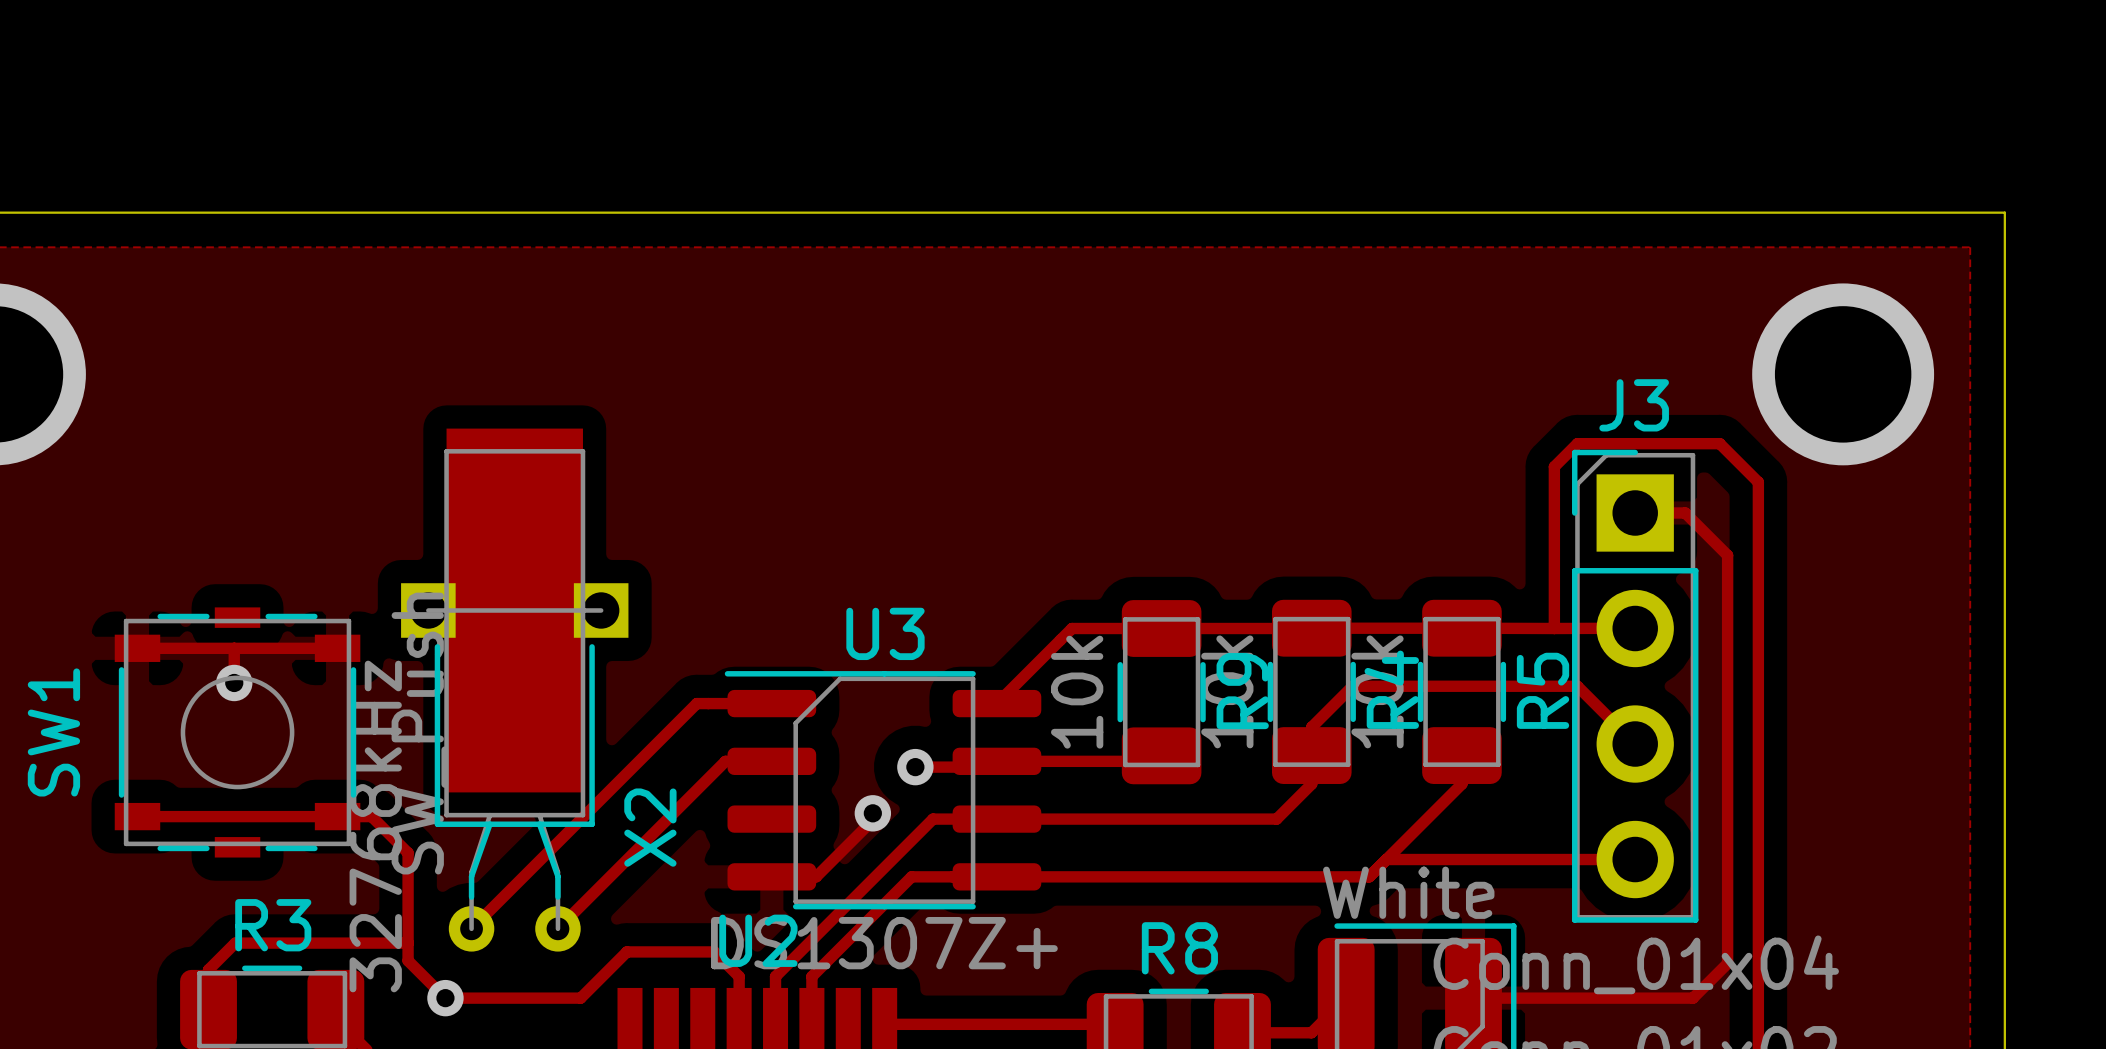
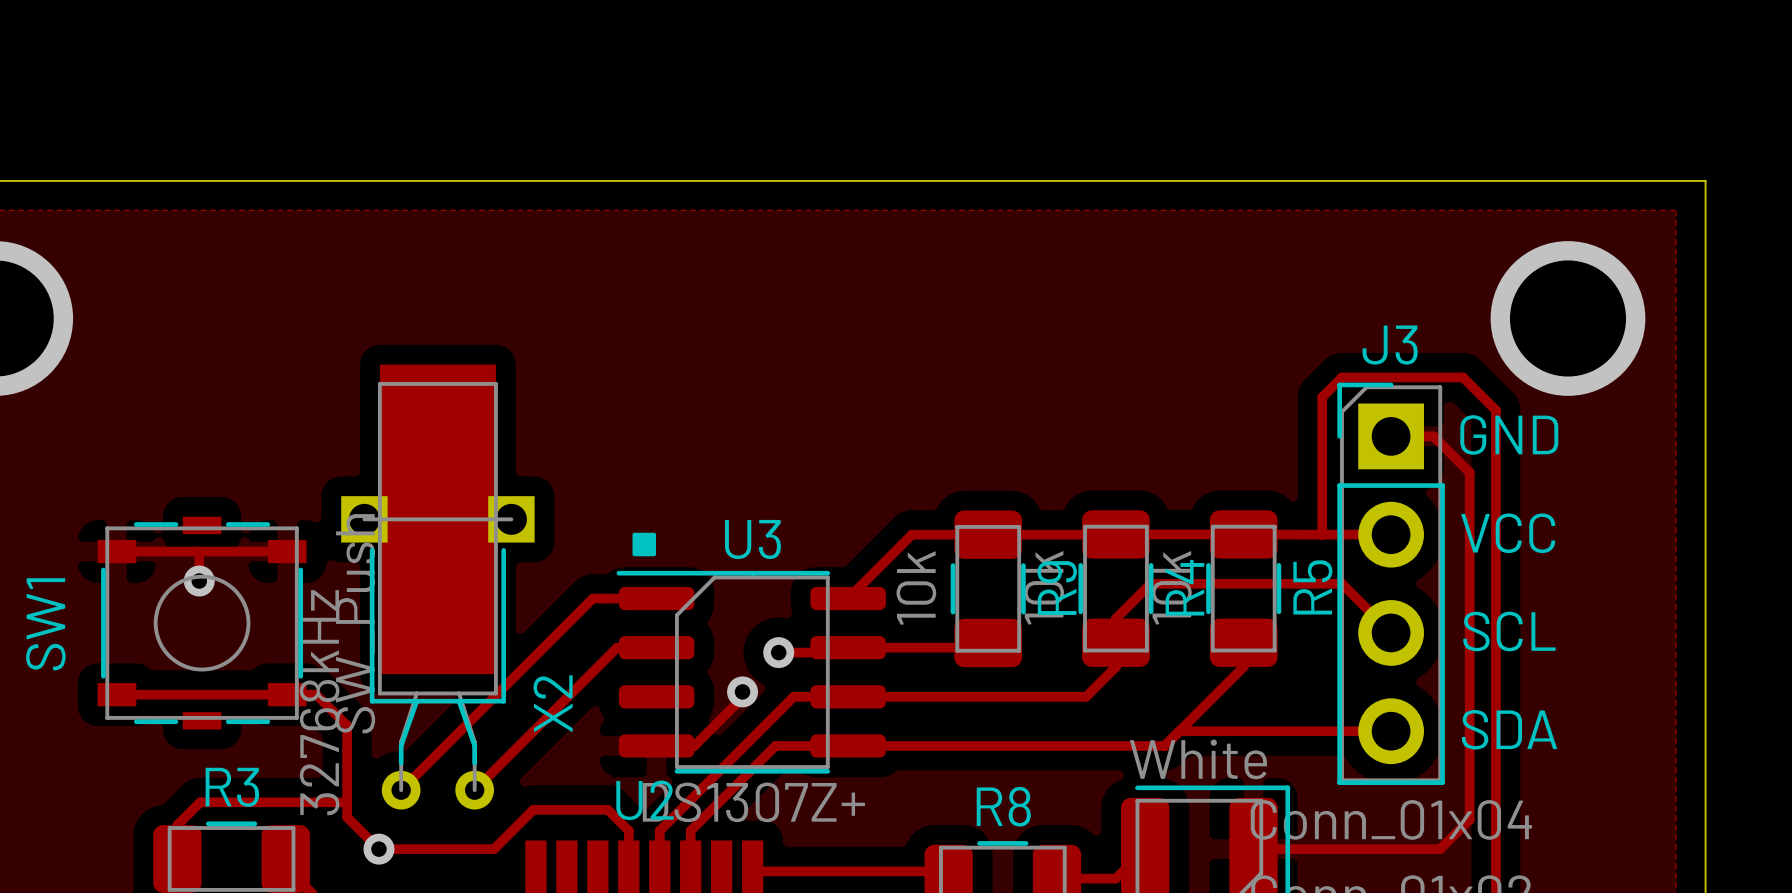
text: none -> GND (1509, 434)
drawing: none -> [632, 532, 657, 557]
text: none -> VCC (1508, 533)
text: none -> SCL (1509, 631)
text: none -> SDA (1509, 729)

